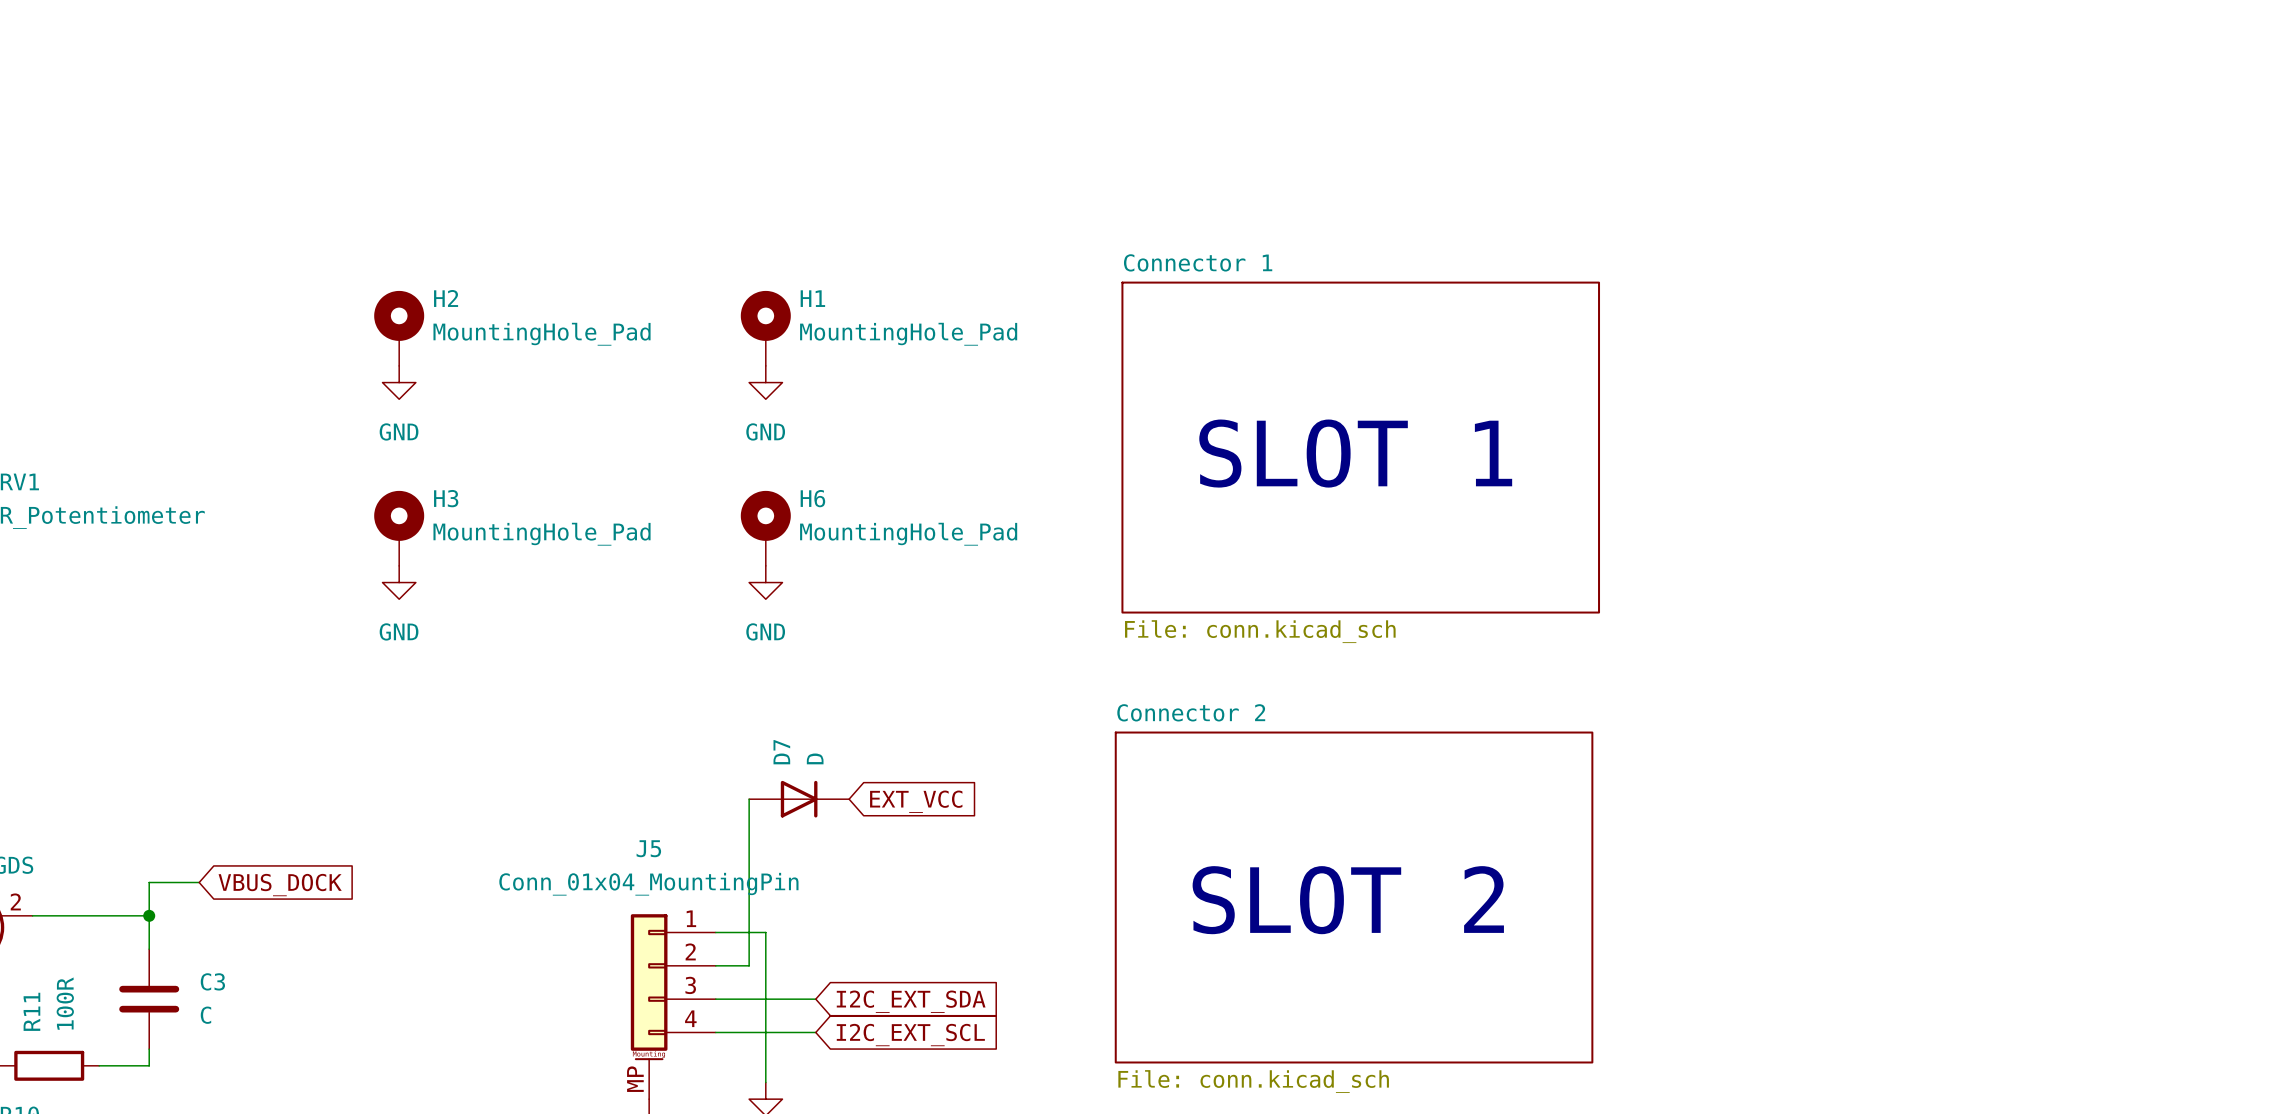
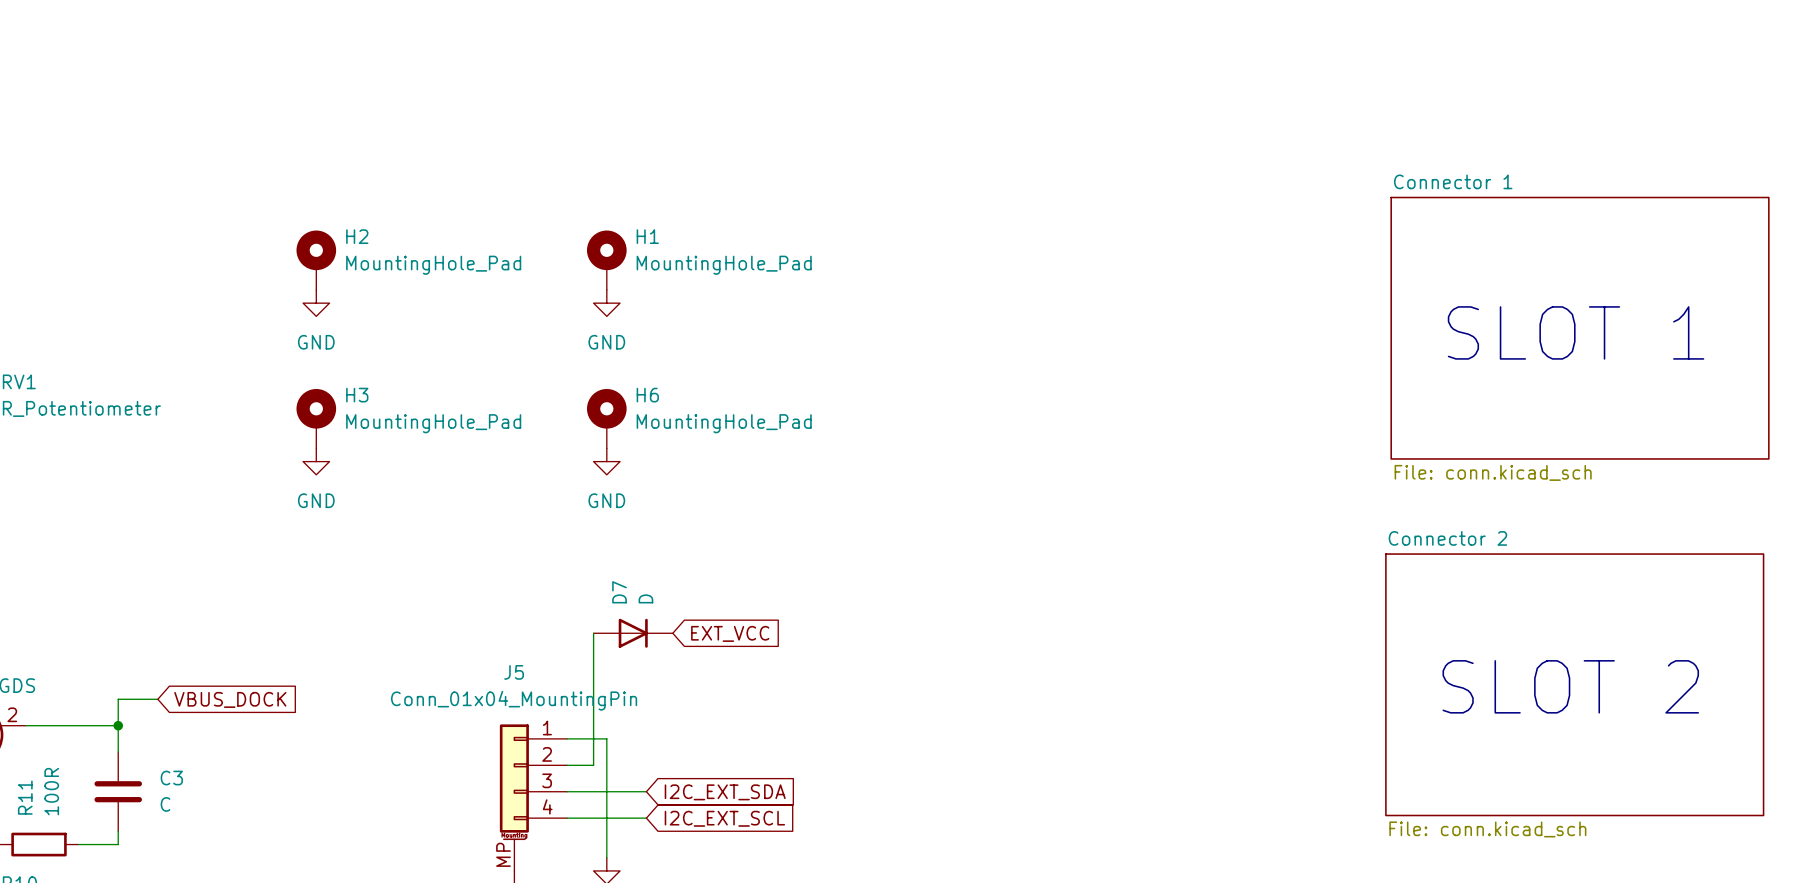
text: none -> SLOT 1 (1576, 332)
sheet Connector 1 position: (1360, 447) -> (1580, 328)
text: SLOT 1 (1355, 453) -> none
text: none -> SLOT 2 (1570, 686)
sheet Connector 2 position: (1354, 897) -> (1574, 684)
text: SLOT 2 (1348, 900) -> none

